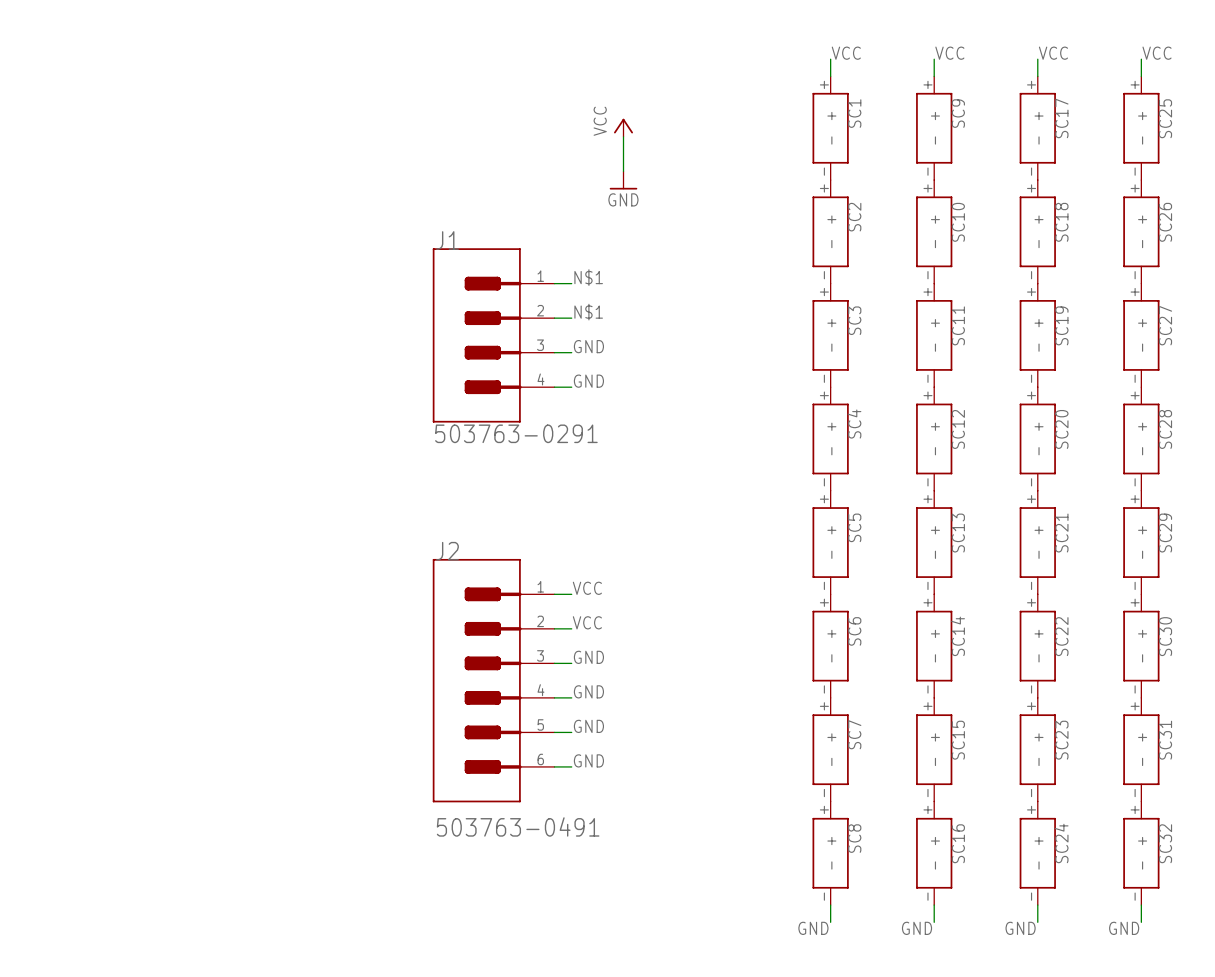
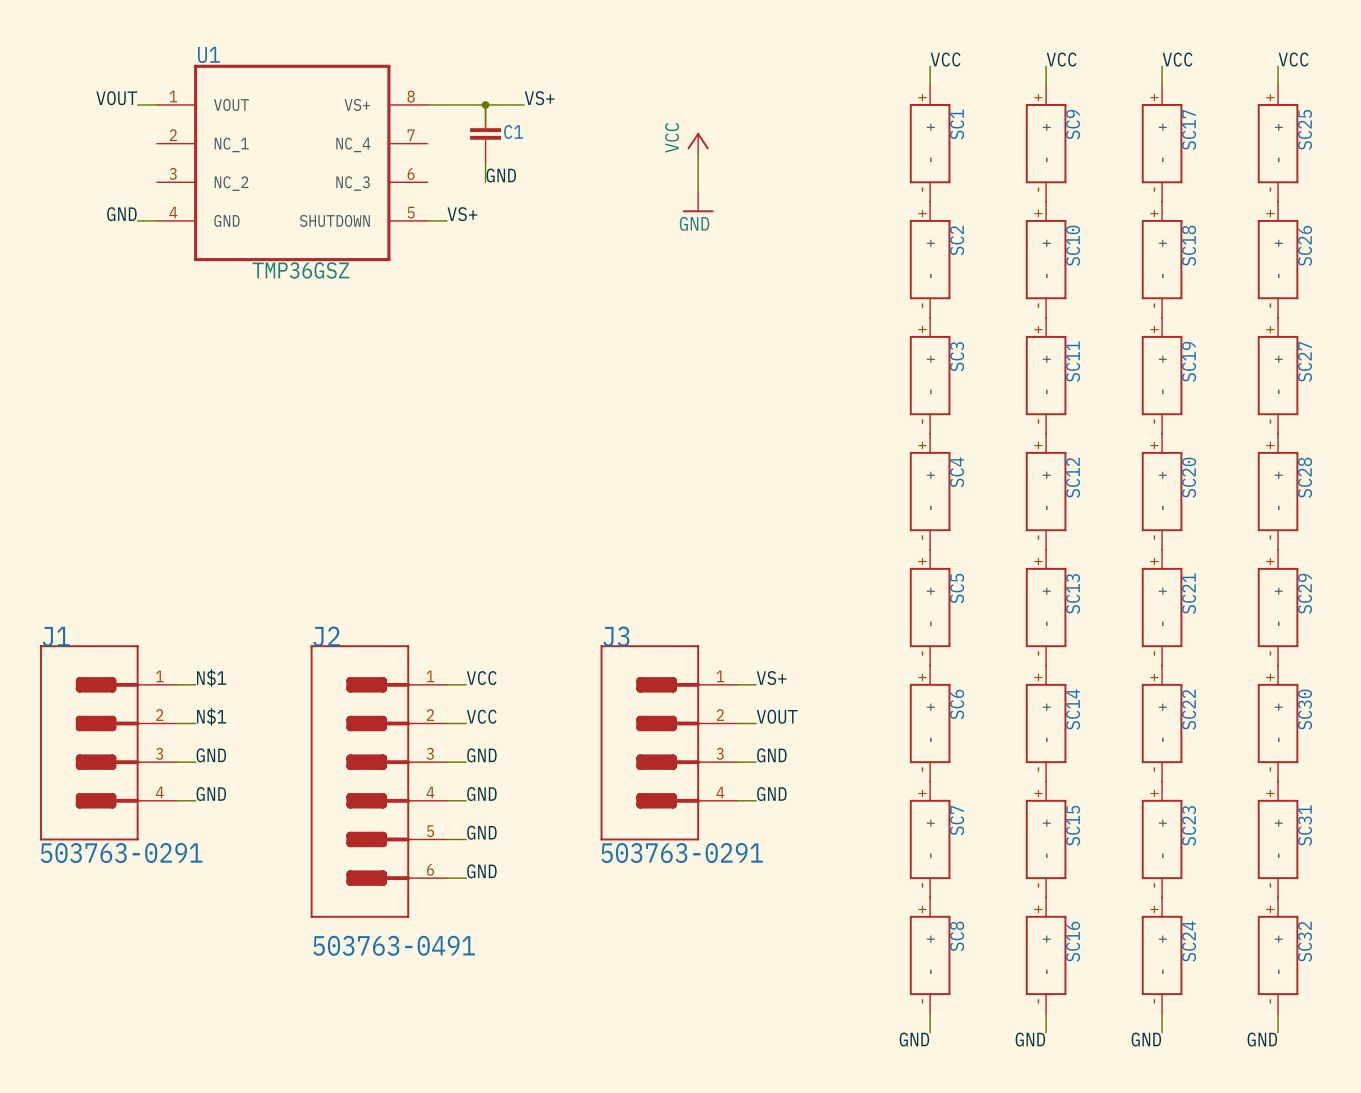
label: none -> VOUT (116, 98)
label: none -> VS+ (539, 98)
wire: none -> (137, 104) (156, 104)
wire: none -> (427, 104) (524, 104)
wire: none -> (485, 104) (485, 124)
junction: none -> (485, 104)
C1: none -> (485, 133)
U1: none -> TMP36GSZ (292, 162)
wire: none -> (485, 162) (485, 182)
label: none -> GND (501, 175)
label: none -> GND (121, 214)
label: none -> VS+ (462, 214)
wire: none -> (137, 220) (156, 220)
wire: none -> (427, 220) (446, 220)
label: N$1 (588, 277) -> none
wire: (554, 283) (571, 283) -> none
label: N$1 (588, 312) -> none
wire: (554, 318) (571, 318) -> none
J1 position: (493, 335) -> (108, 742)
label: GND (588, 346) -> none
wire: (554, 352) (571, 352) -> none
label: GND (588, 381) -> none
wire: (554, 387) (571, 387) -> none
label: VCC (587, 588) -> none
wire: (554, 594) (571, 594) -> (446, 684) (466, 684)
label: none -> N$1 (211, 678)
label: none -> VCC (481, 678)
label: none -> VS+ (771, 678)
wire: none -> (176, 684) (195, 684)
wire: none -> (736, 684) (756, 684)
label: VCC (587, 622) -> none
wire: (554, 628) (571, 628) -> (446, 723) (466, 723)
label: none -> N$1 (211, 716)
label: none -> VCC (481, 716)
label: none -> VOUT (777, 716)
wire: none -> (176, 723) (195, 723)
wire: none -> (736, 723) (756, 723)
label: GND (588, 657) -> none
wire: (554, 663) (571, 663) -> (446, 762) (466, 762)
J3: none -> (668, 742)
label: none -> GND (211, 755)
label: none -> GND (481, 755)
label: none -> GND (771, 755)
wire: none -> (176, 762) (195, 762)
J2 position: (493, 680) -> (378, 781)
wire: none -> (736, 762) (756, 762)
label: GND (588, 691) -> none
wire: (554, 697) (571, 697) -> (446, 800) (466, 800)
label: none -> GND (211, 794)
label: none -> GND (481, 794)
label: none -> GND (771, 794)
wire: none -> (176, 800) (195, 800)
wire: none -> (736, 800) (756, 800)
label: GND (588, 726) -> none
wire: (554, 732) (571, 732) -> (446, 839) (466, 839)
label: none -> GND (481, 832)
label: GND (588, 760) -> none
wire: (554, 766) (571, 766) -> (446, 878) (466, 878)
label: none -> GND (481, 871)

